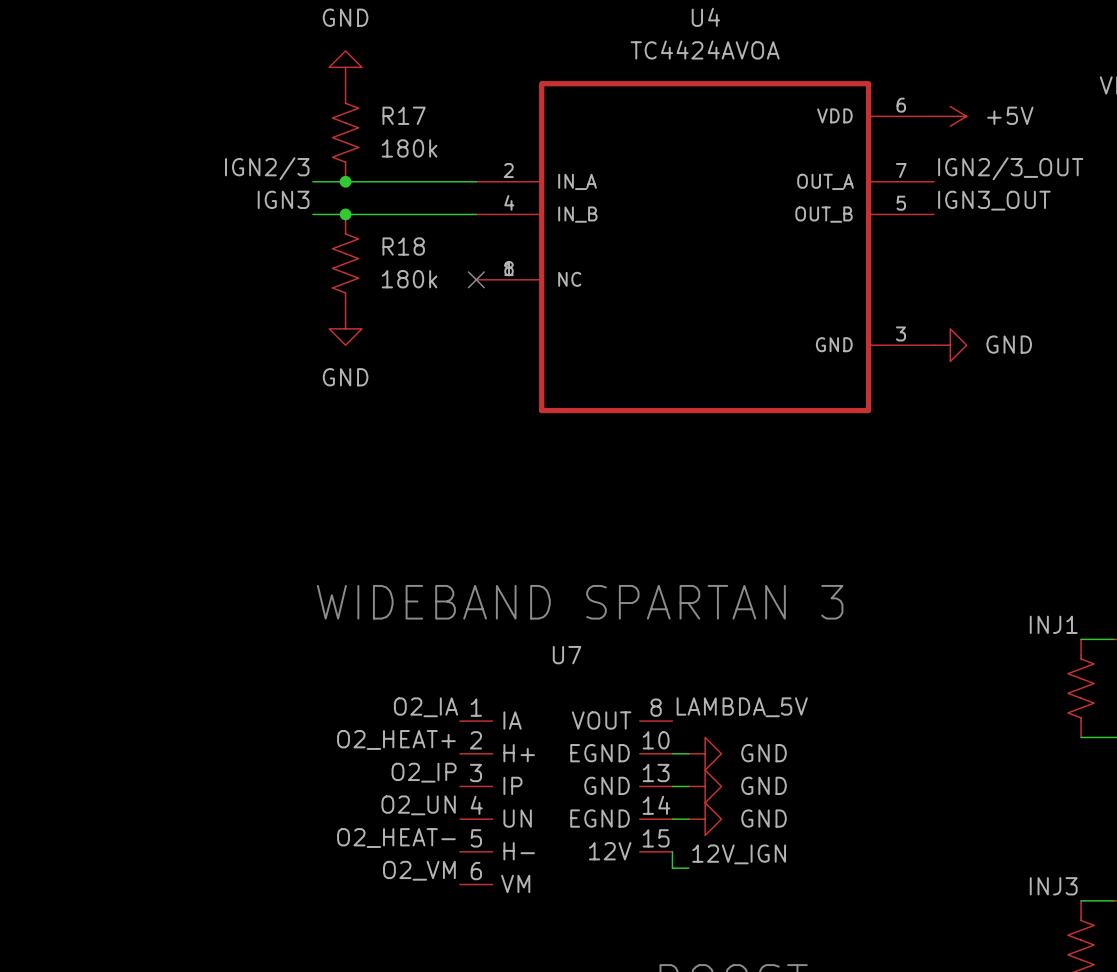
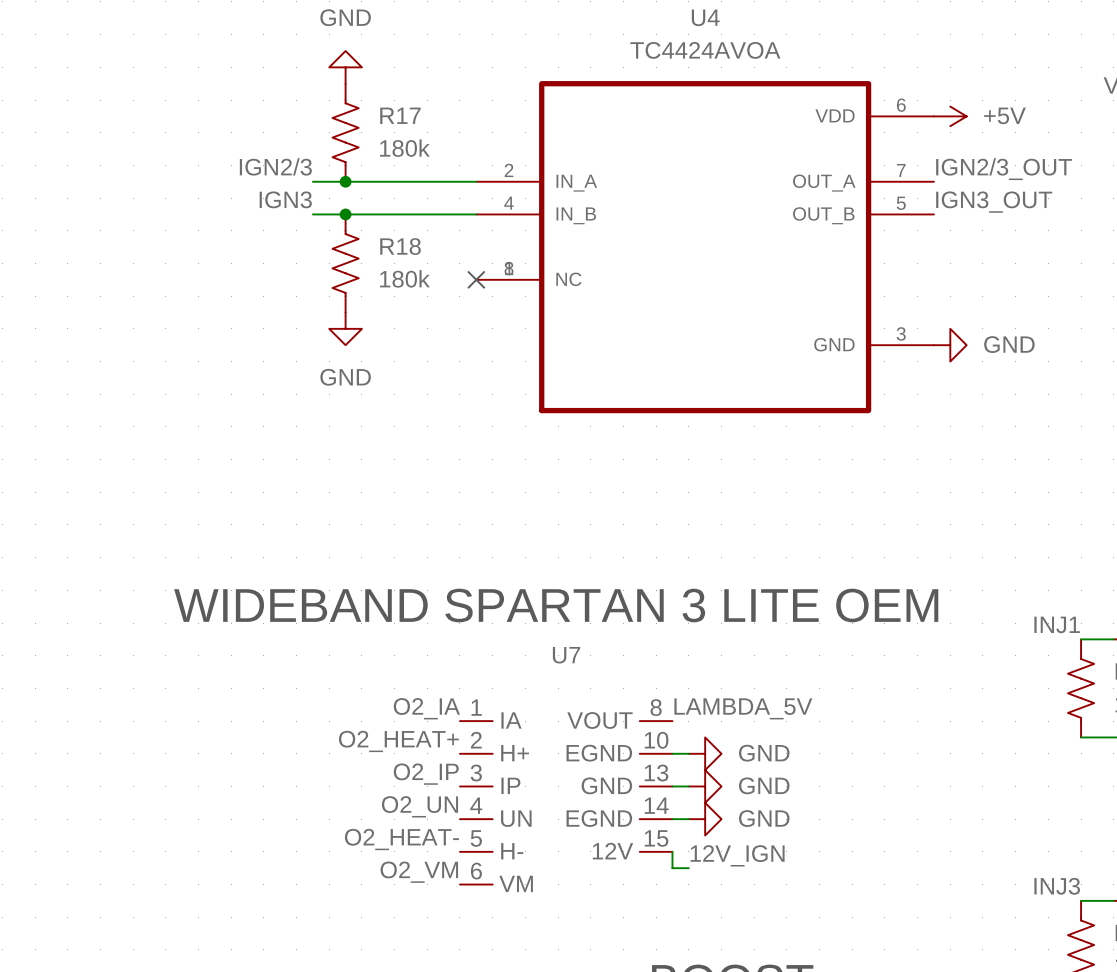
text: WIDEBAND SPARTAN 3 (580, 602) -> WIDEBAND SPARTAN 3 LITE OEM (556, 605)

